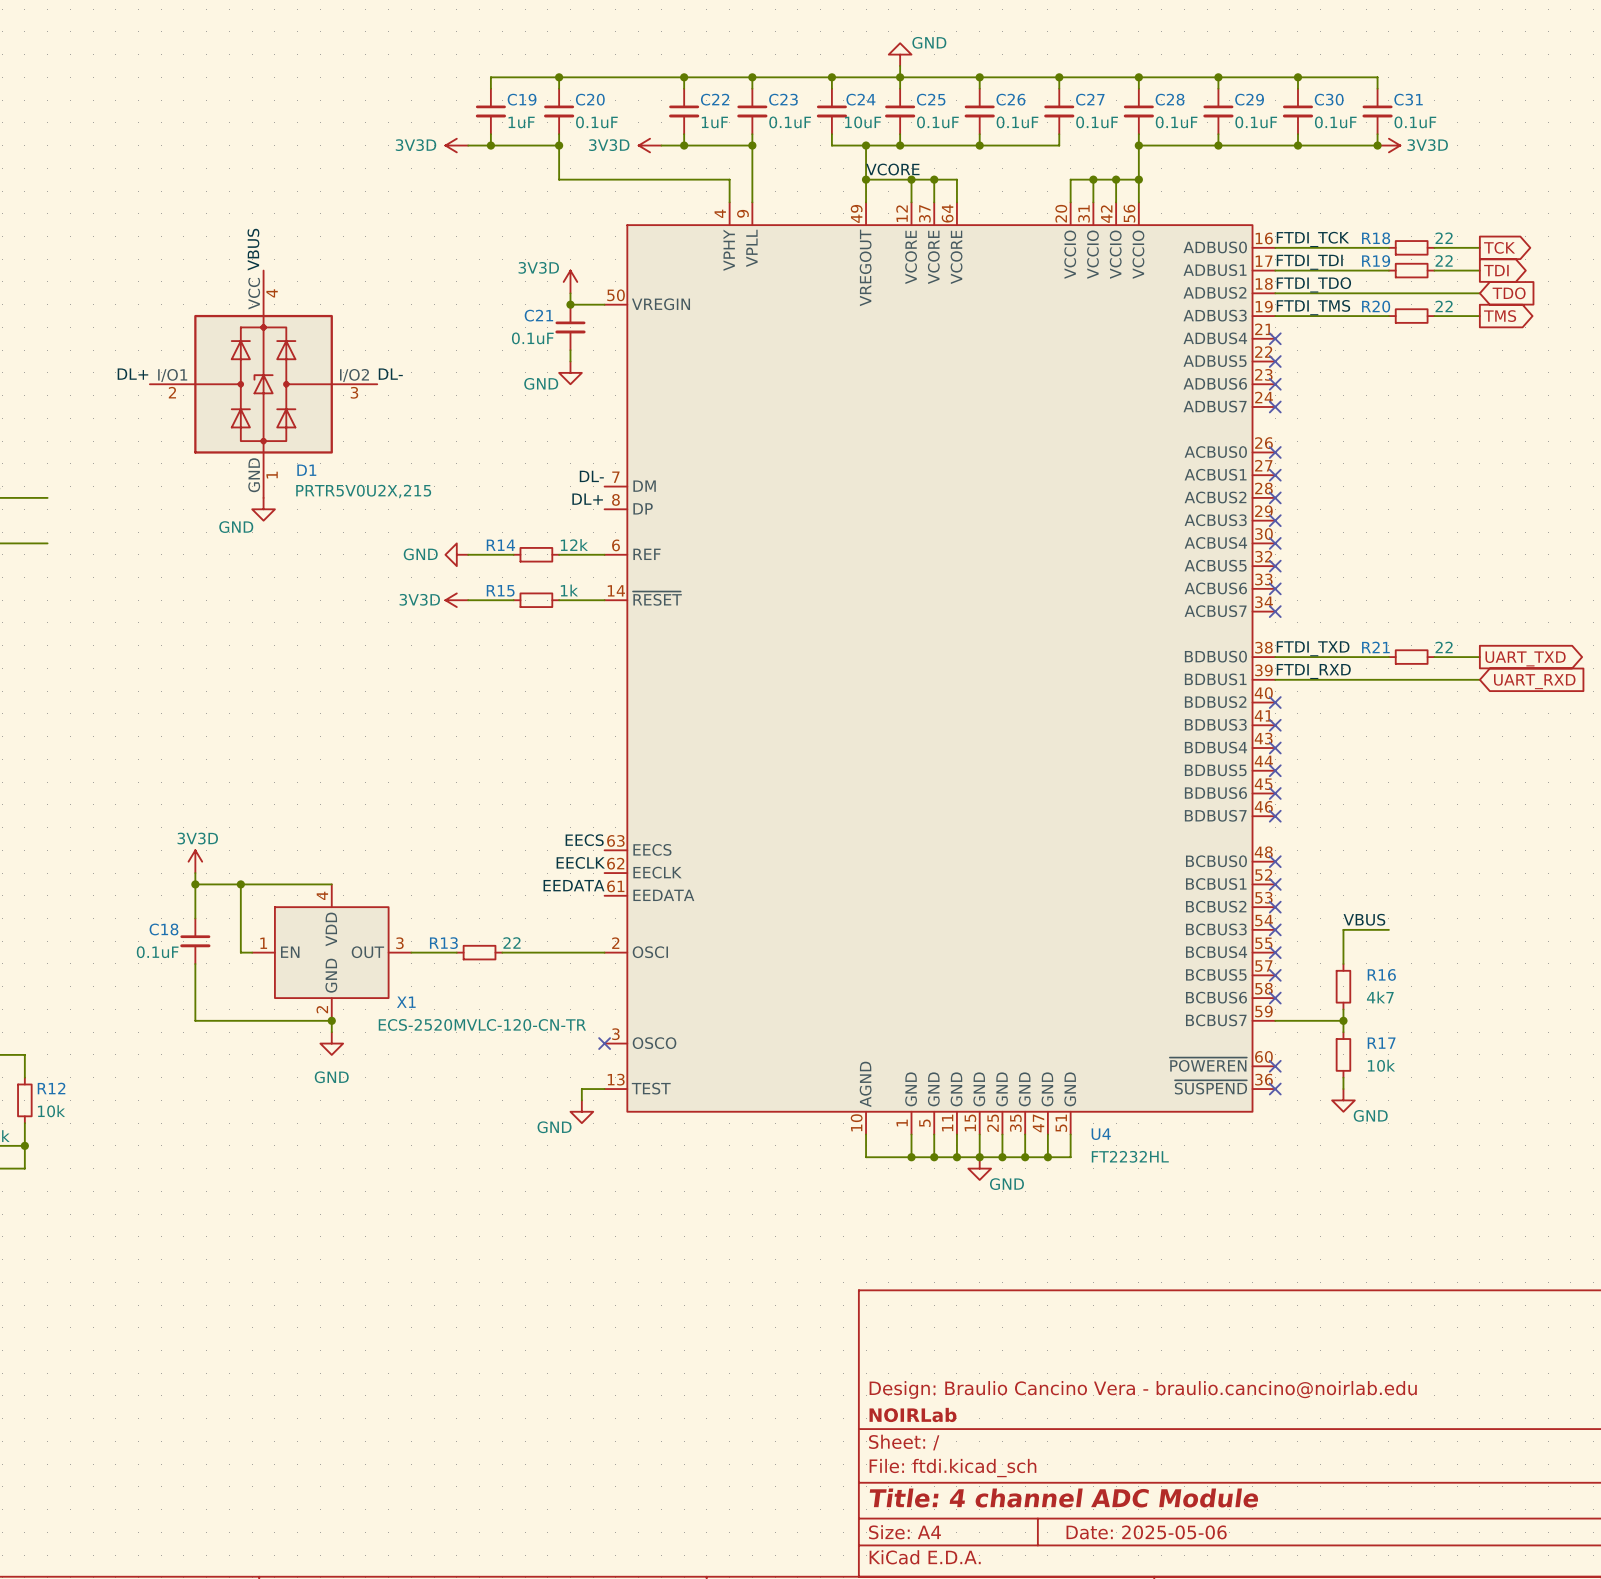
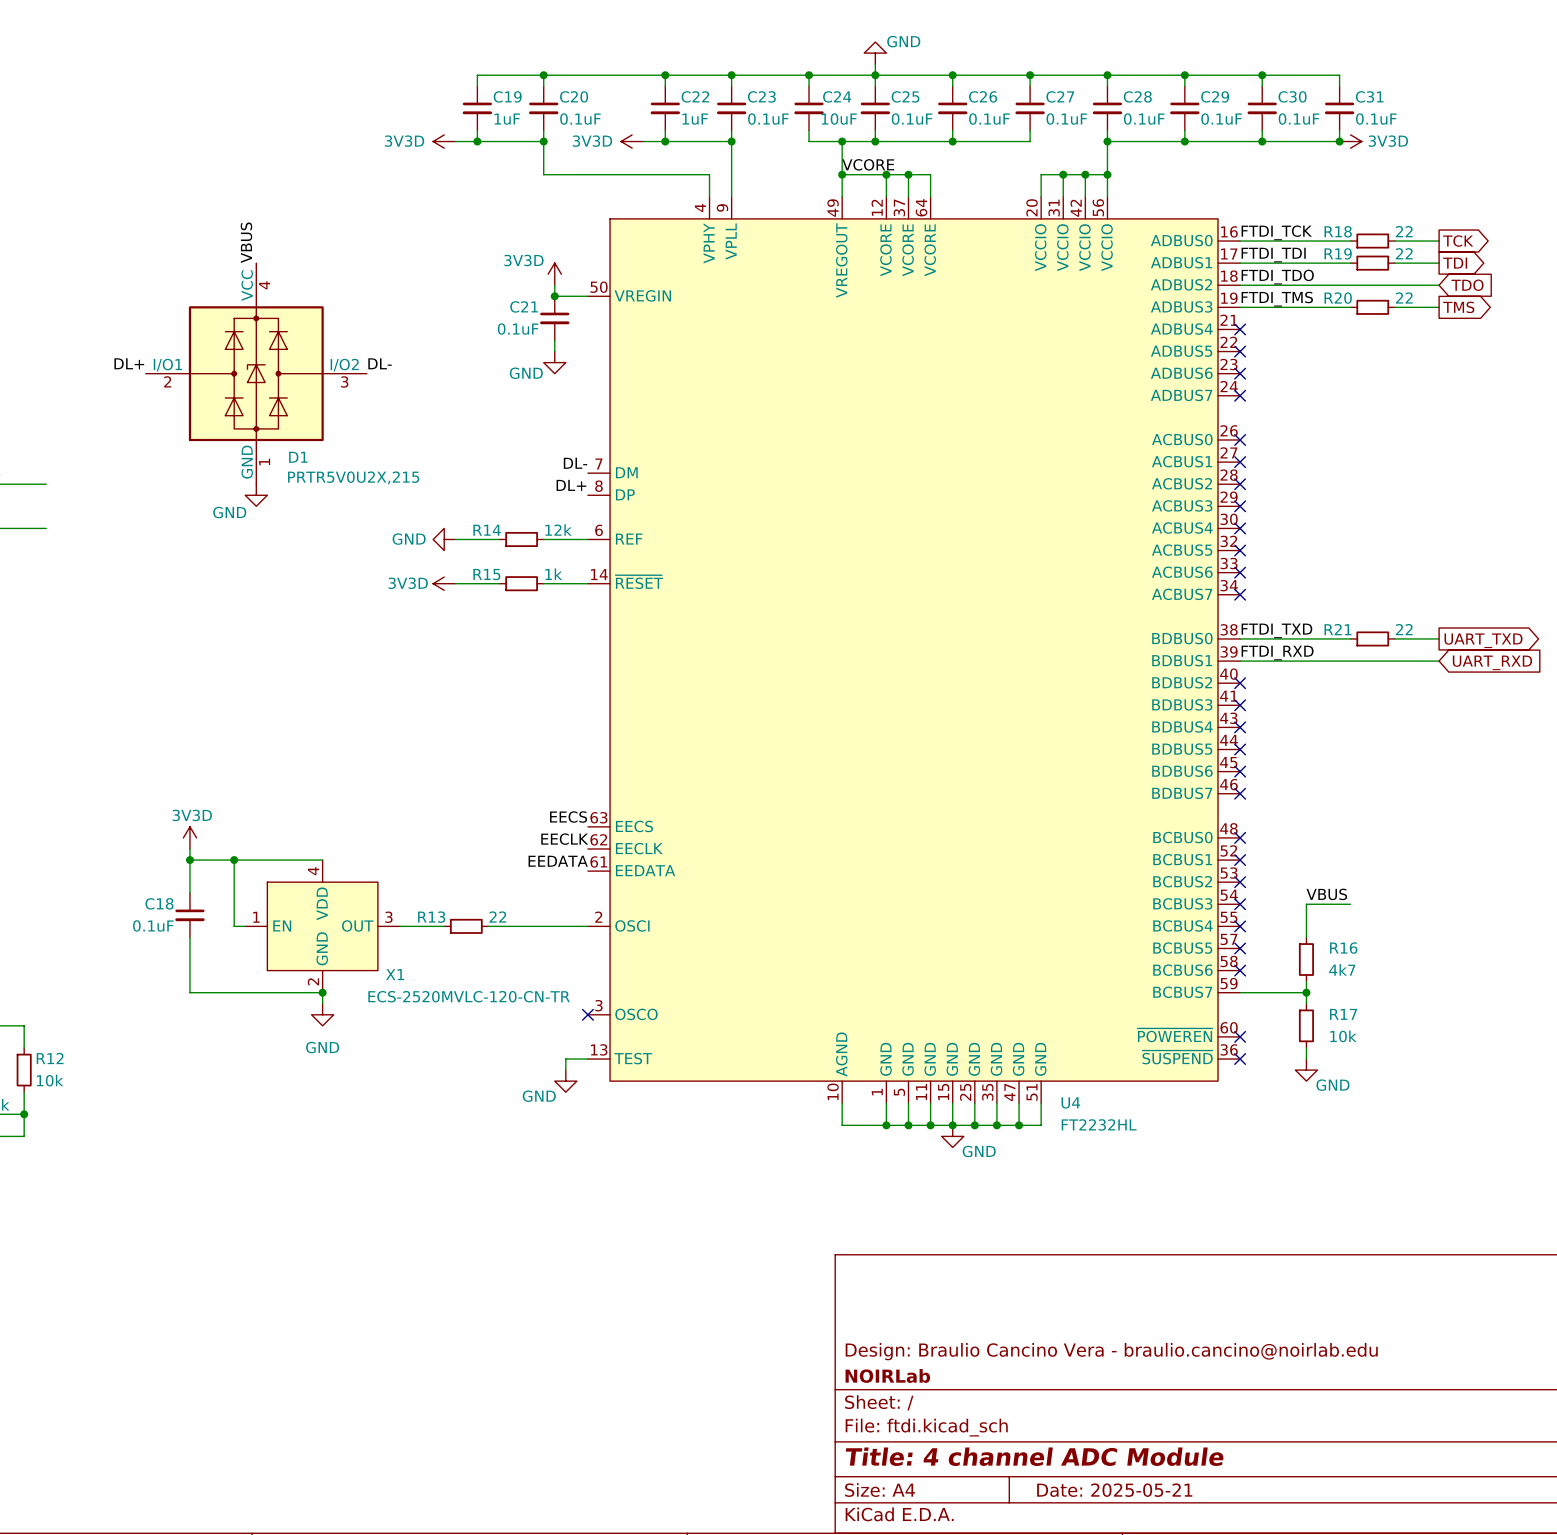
title block: Date: 2025-05-06 (1146, 1532) -> Date: 2025-05-21 (1114, 1490)

